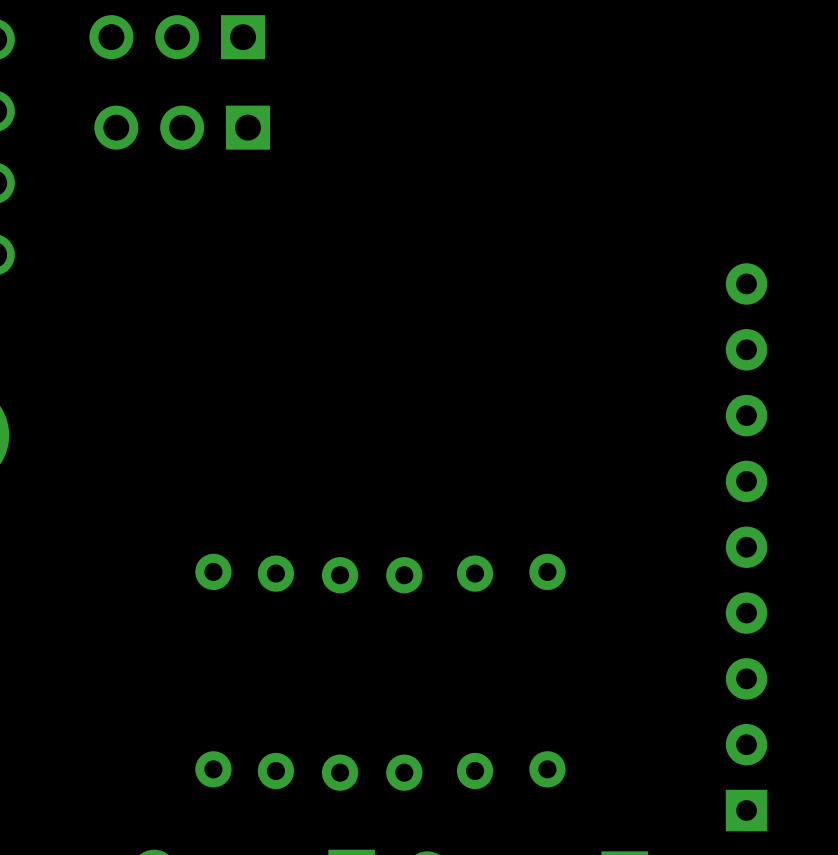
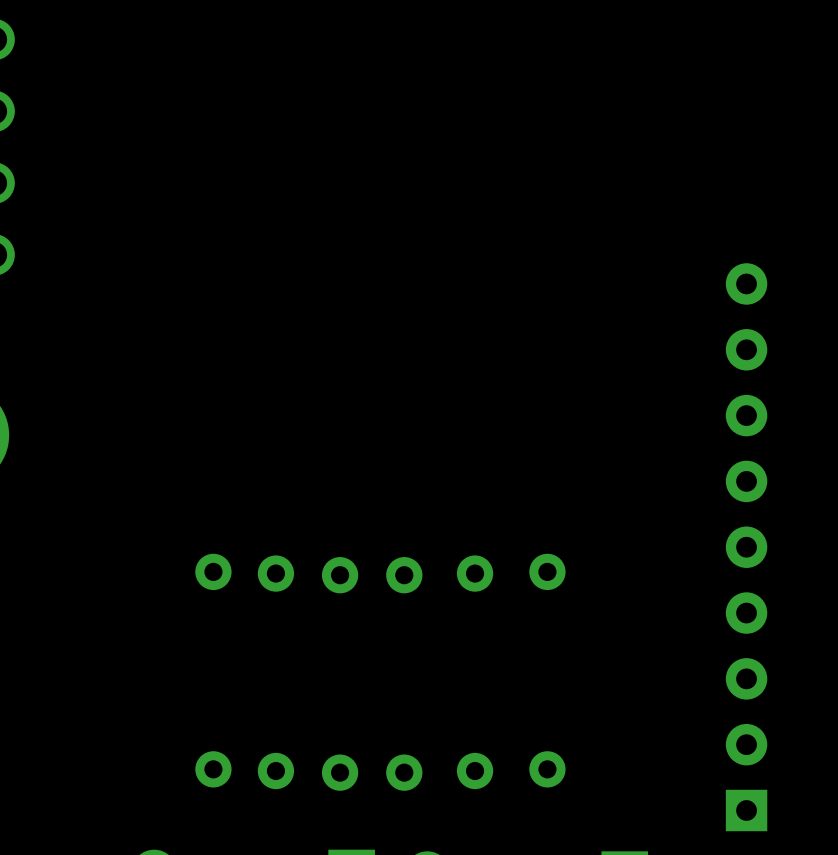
part: (177, 37) -> none
part: (182, 127) -> none

